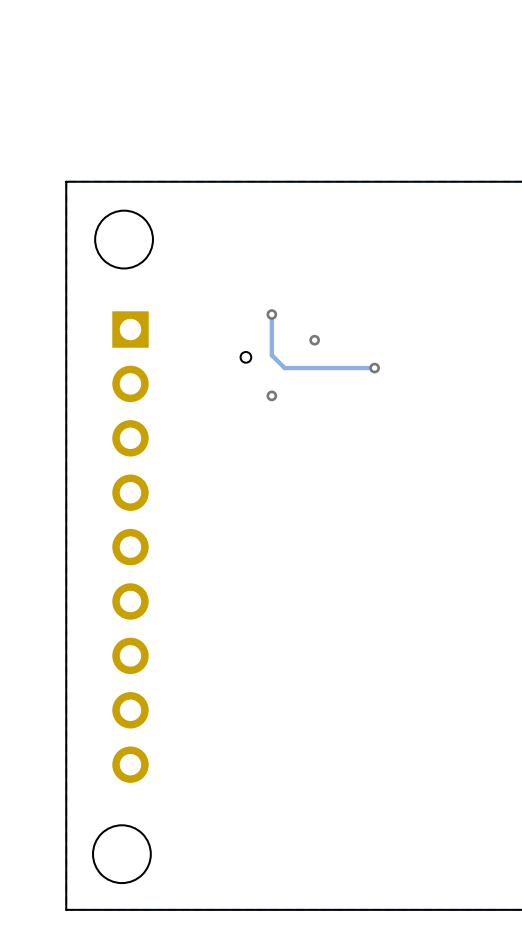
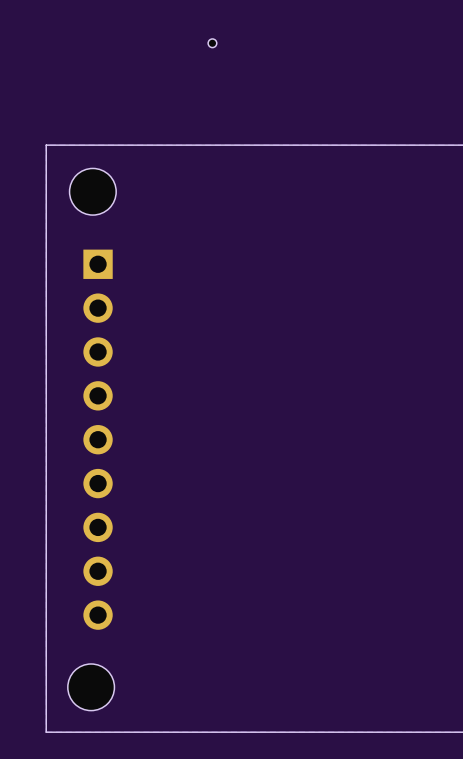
track: (271, 314) (271, 355) (284, 368) (374, 368) -> none
via: (271, 314) -> none
via: (314, 340) -> none
part position: (245, 357) -> (212, 43)
via: (374, 368) -> none
via: (271, 395) -> none

